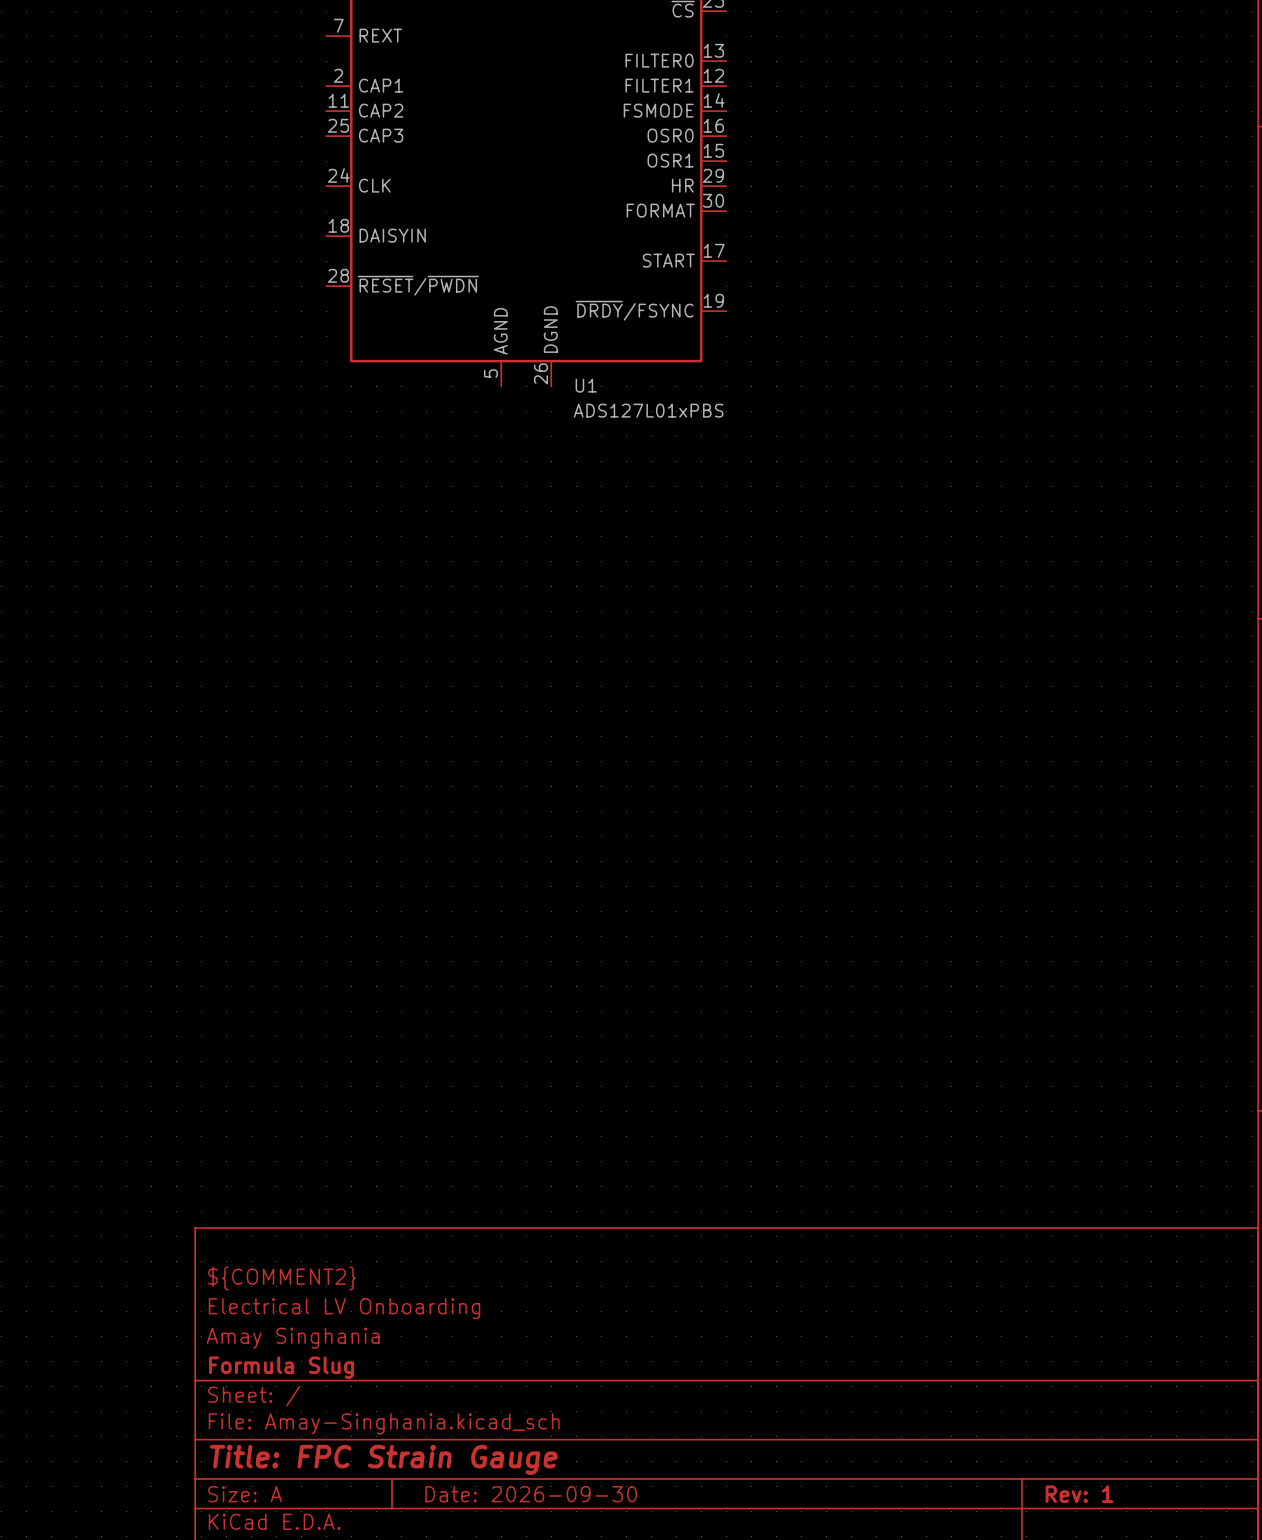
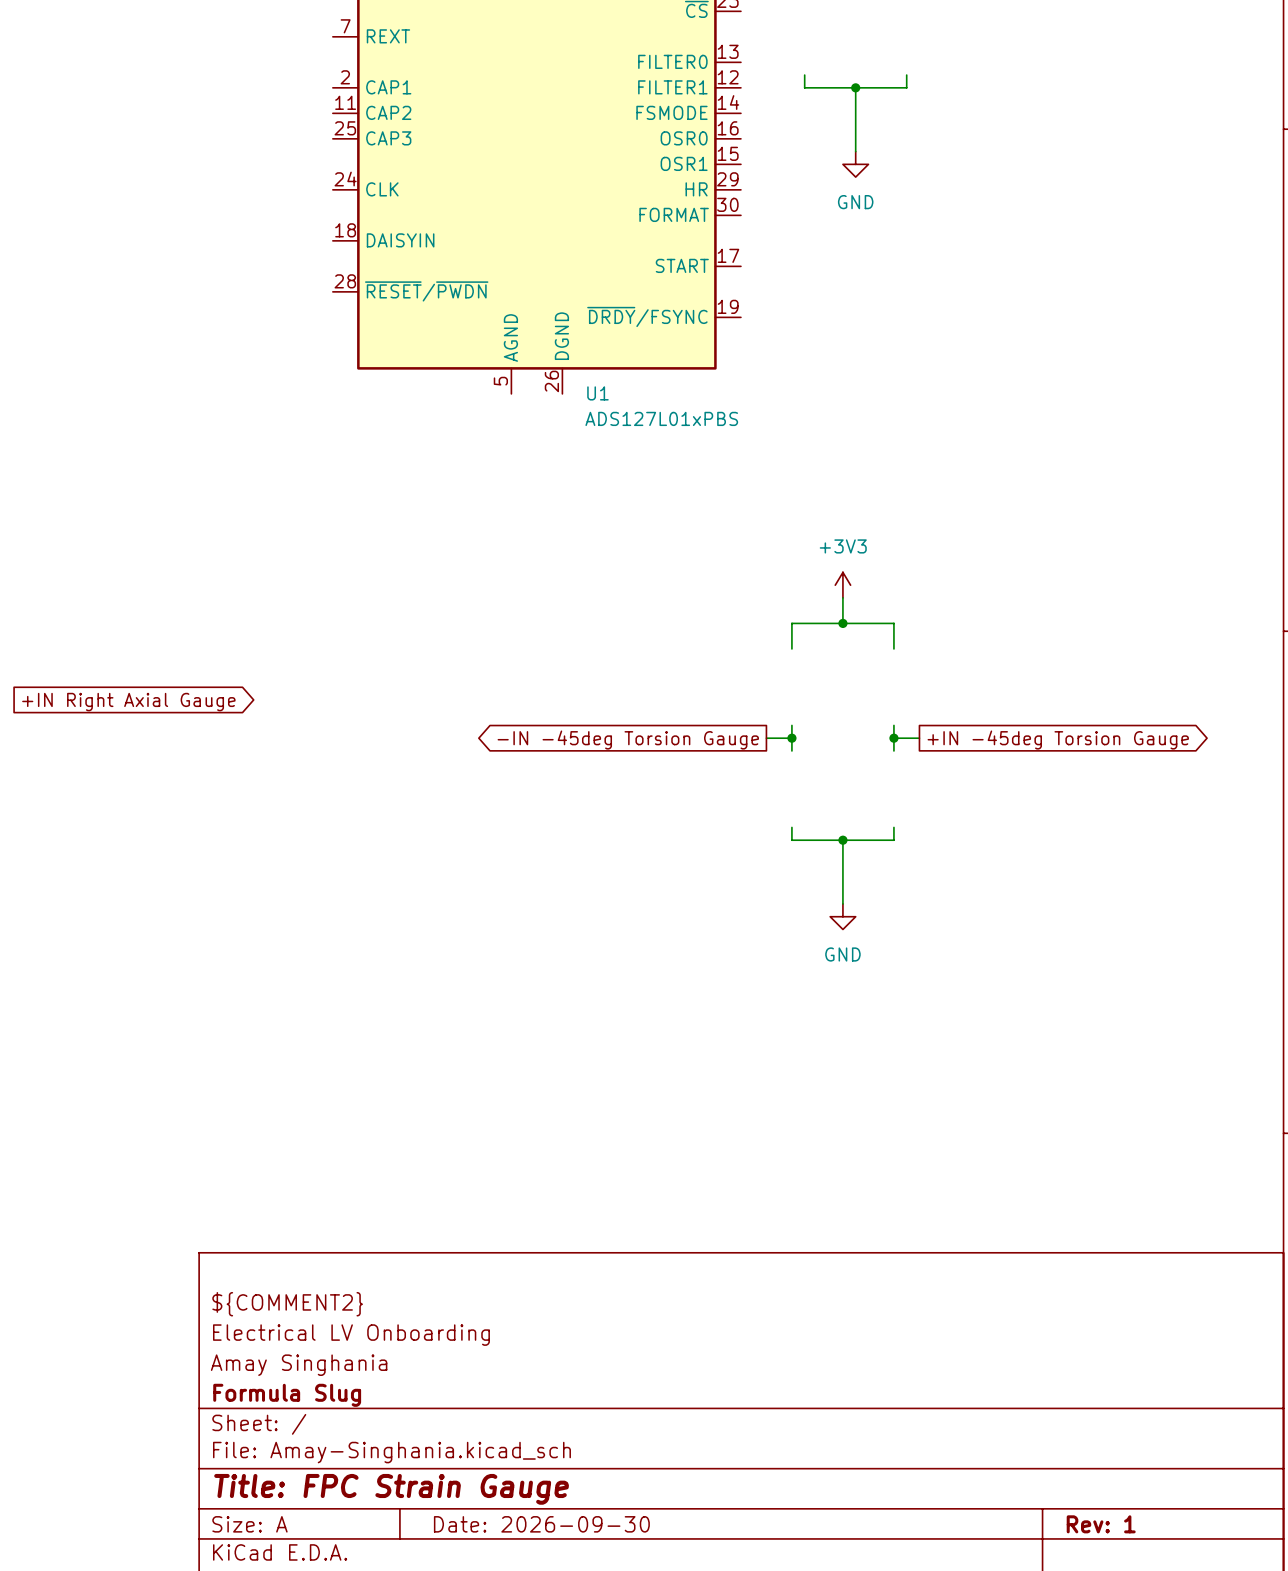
wire: none -> (804, 75) (804, 87) (906, 87) (906, 75)
wire: none -> (855, 87) (855, 151)
junction: none -> (855, 87)
power symbol: none -> GND (855, 164)
power symbol: none -> +3V3 (842, 585)
wire: none -> (842, 597) (842, 623)
junction: none -> (842, 623)
wire: none -> (791, 648) (791, 623) (893, 623) (893, 648)
global label: none -> +IN Right Axial Gauge (128, 702)
wire: none -> (791, 725) (791, 750)
wire: none -> (893, 725) (893, 750)
wire: none -> (766, 738) (791, 738)
junction: none -> (791, 738)
wire: none -> (893, 738) (919, 738)
junction: none -> (893, 738)
global label: none -> -IN -45deg Torsion Gauge (628, 740)
global label: none -> +IN -45deg Torsion Gauge (1058, 740)
wire: none -> (791, 827) (791, 840) (893, 840) (893, 827)
wire: none -> (842, 840) (842, 903)
junction: none -> (842, 840)
power symbol: none -> GND (842, 916)

